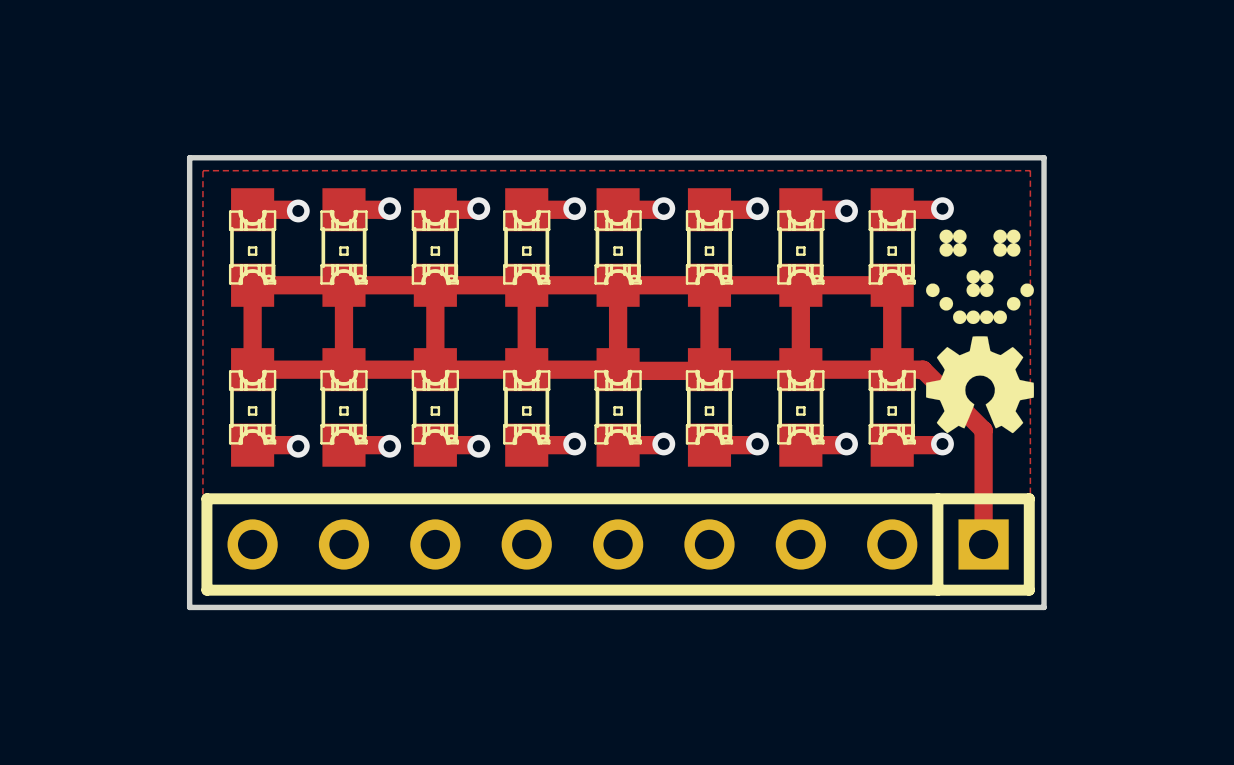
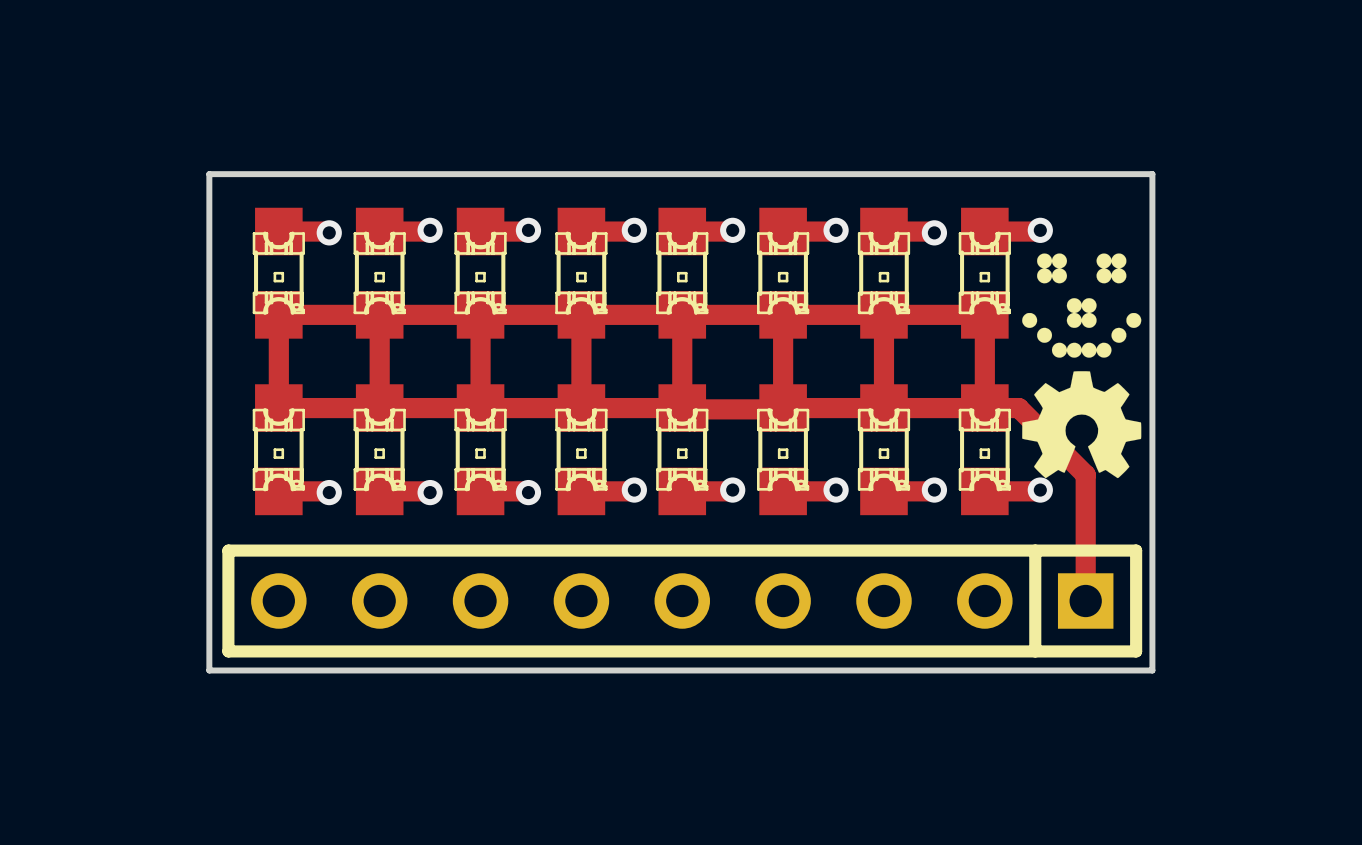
zone outline: (202, 170) (202, 593) (1030, 593) (1030, 170) (202, 170) -> none

